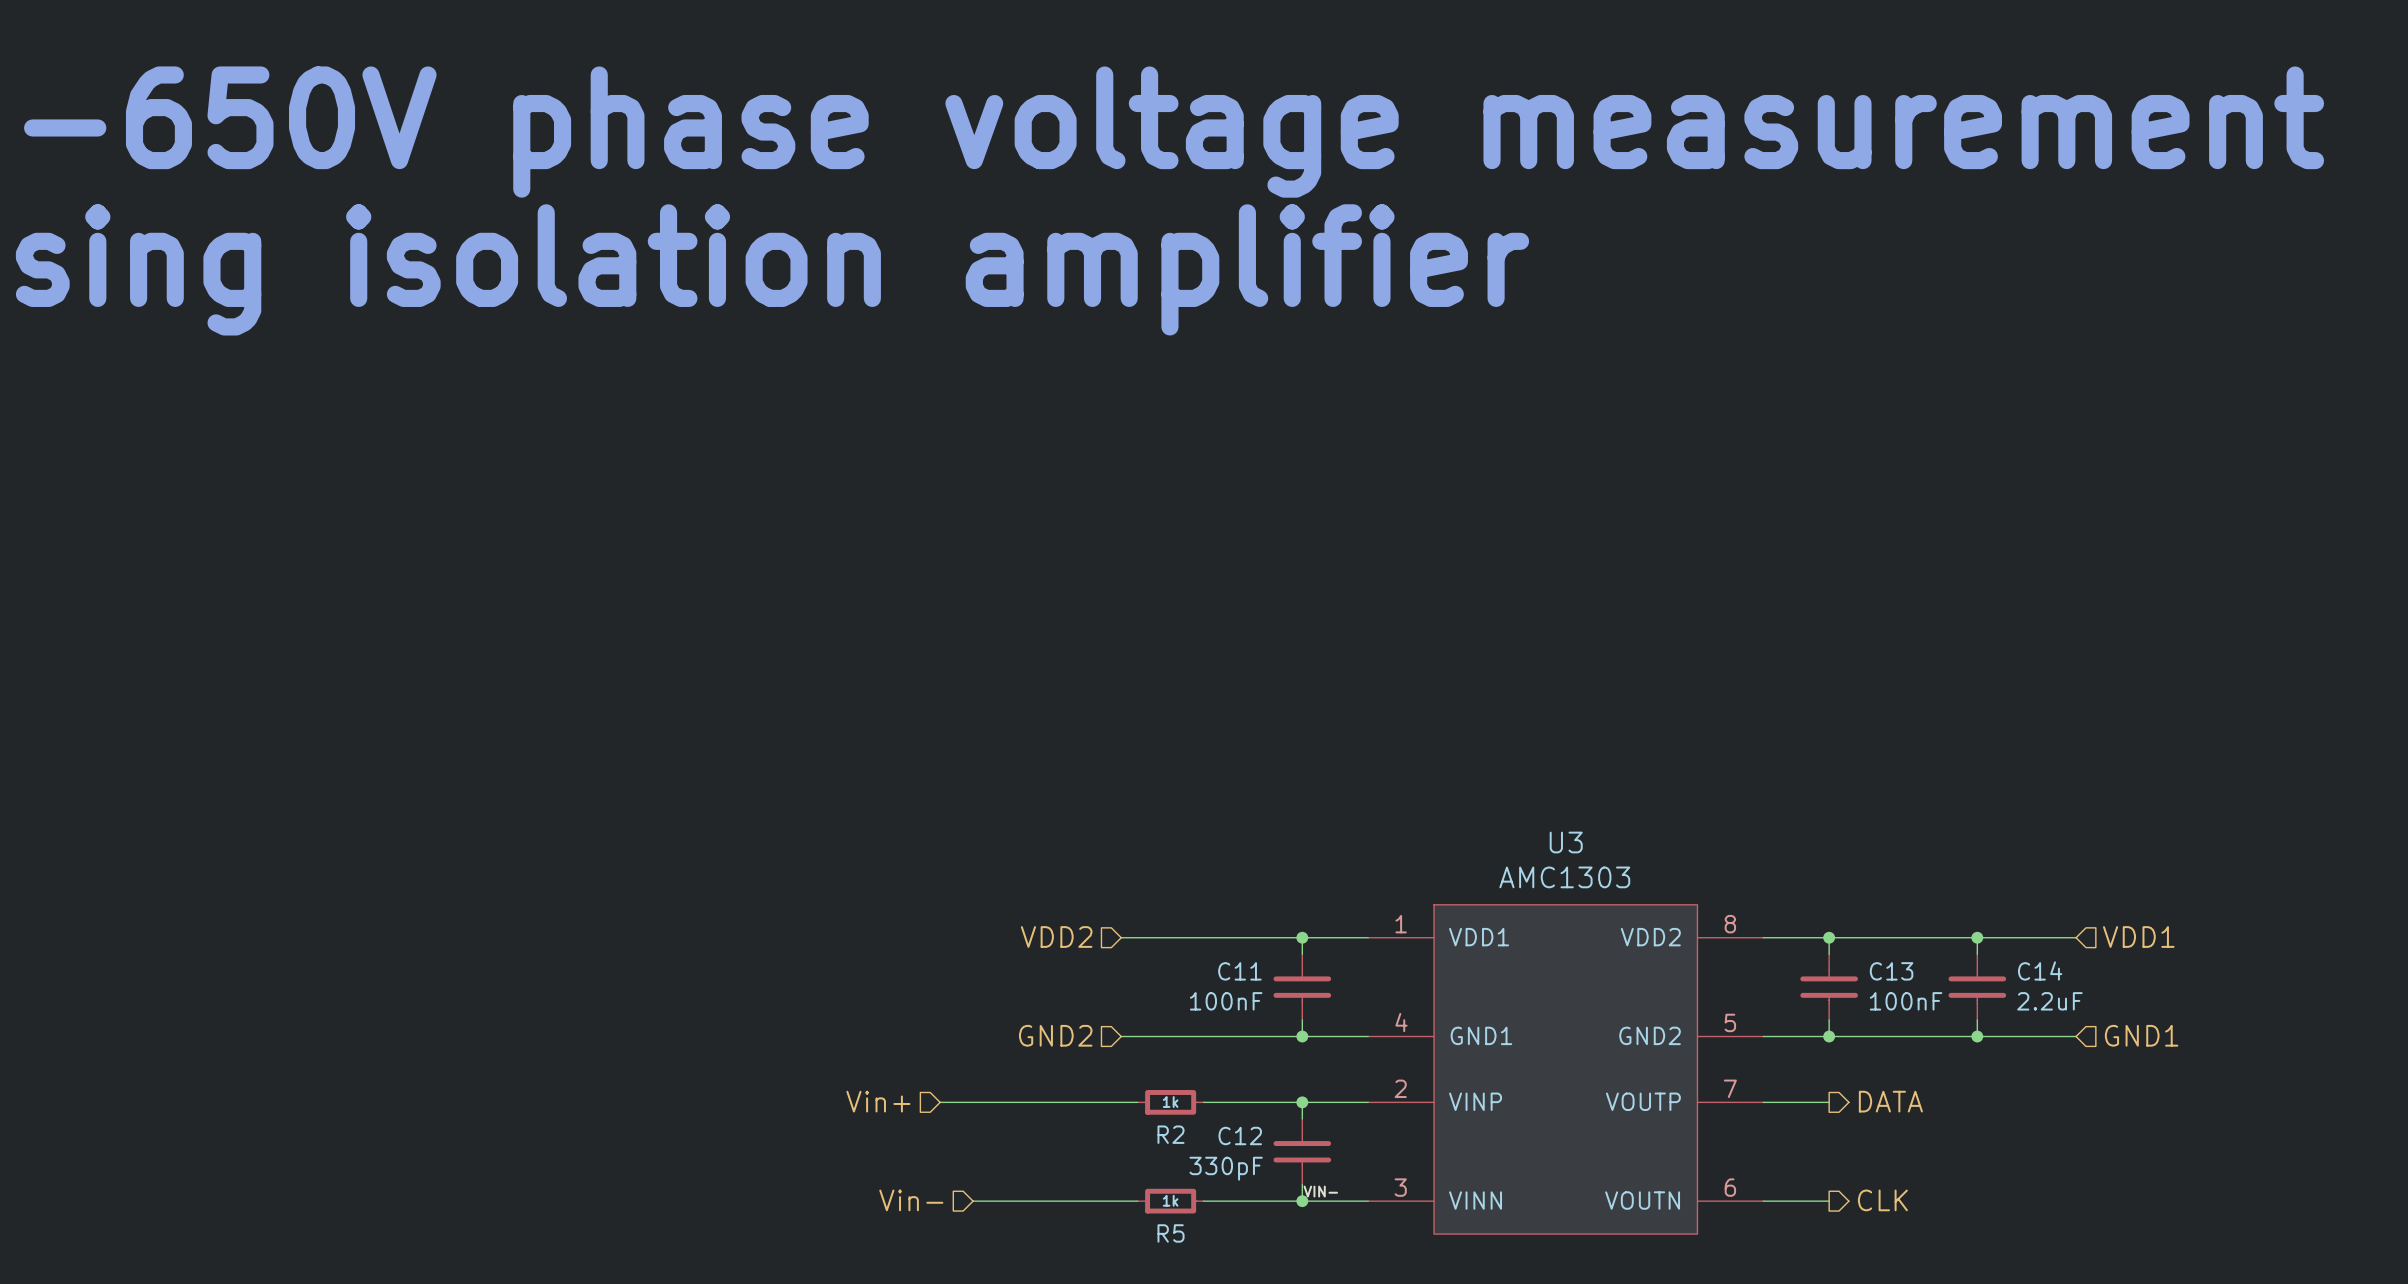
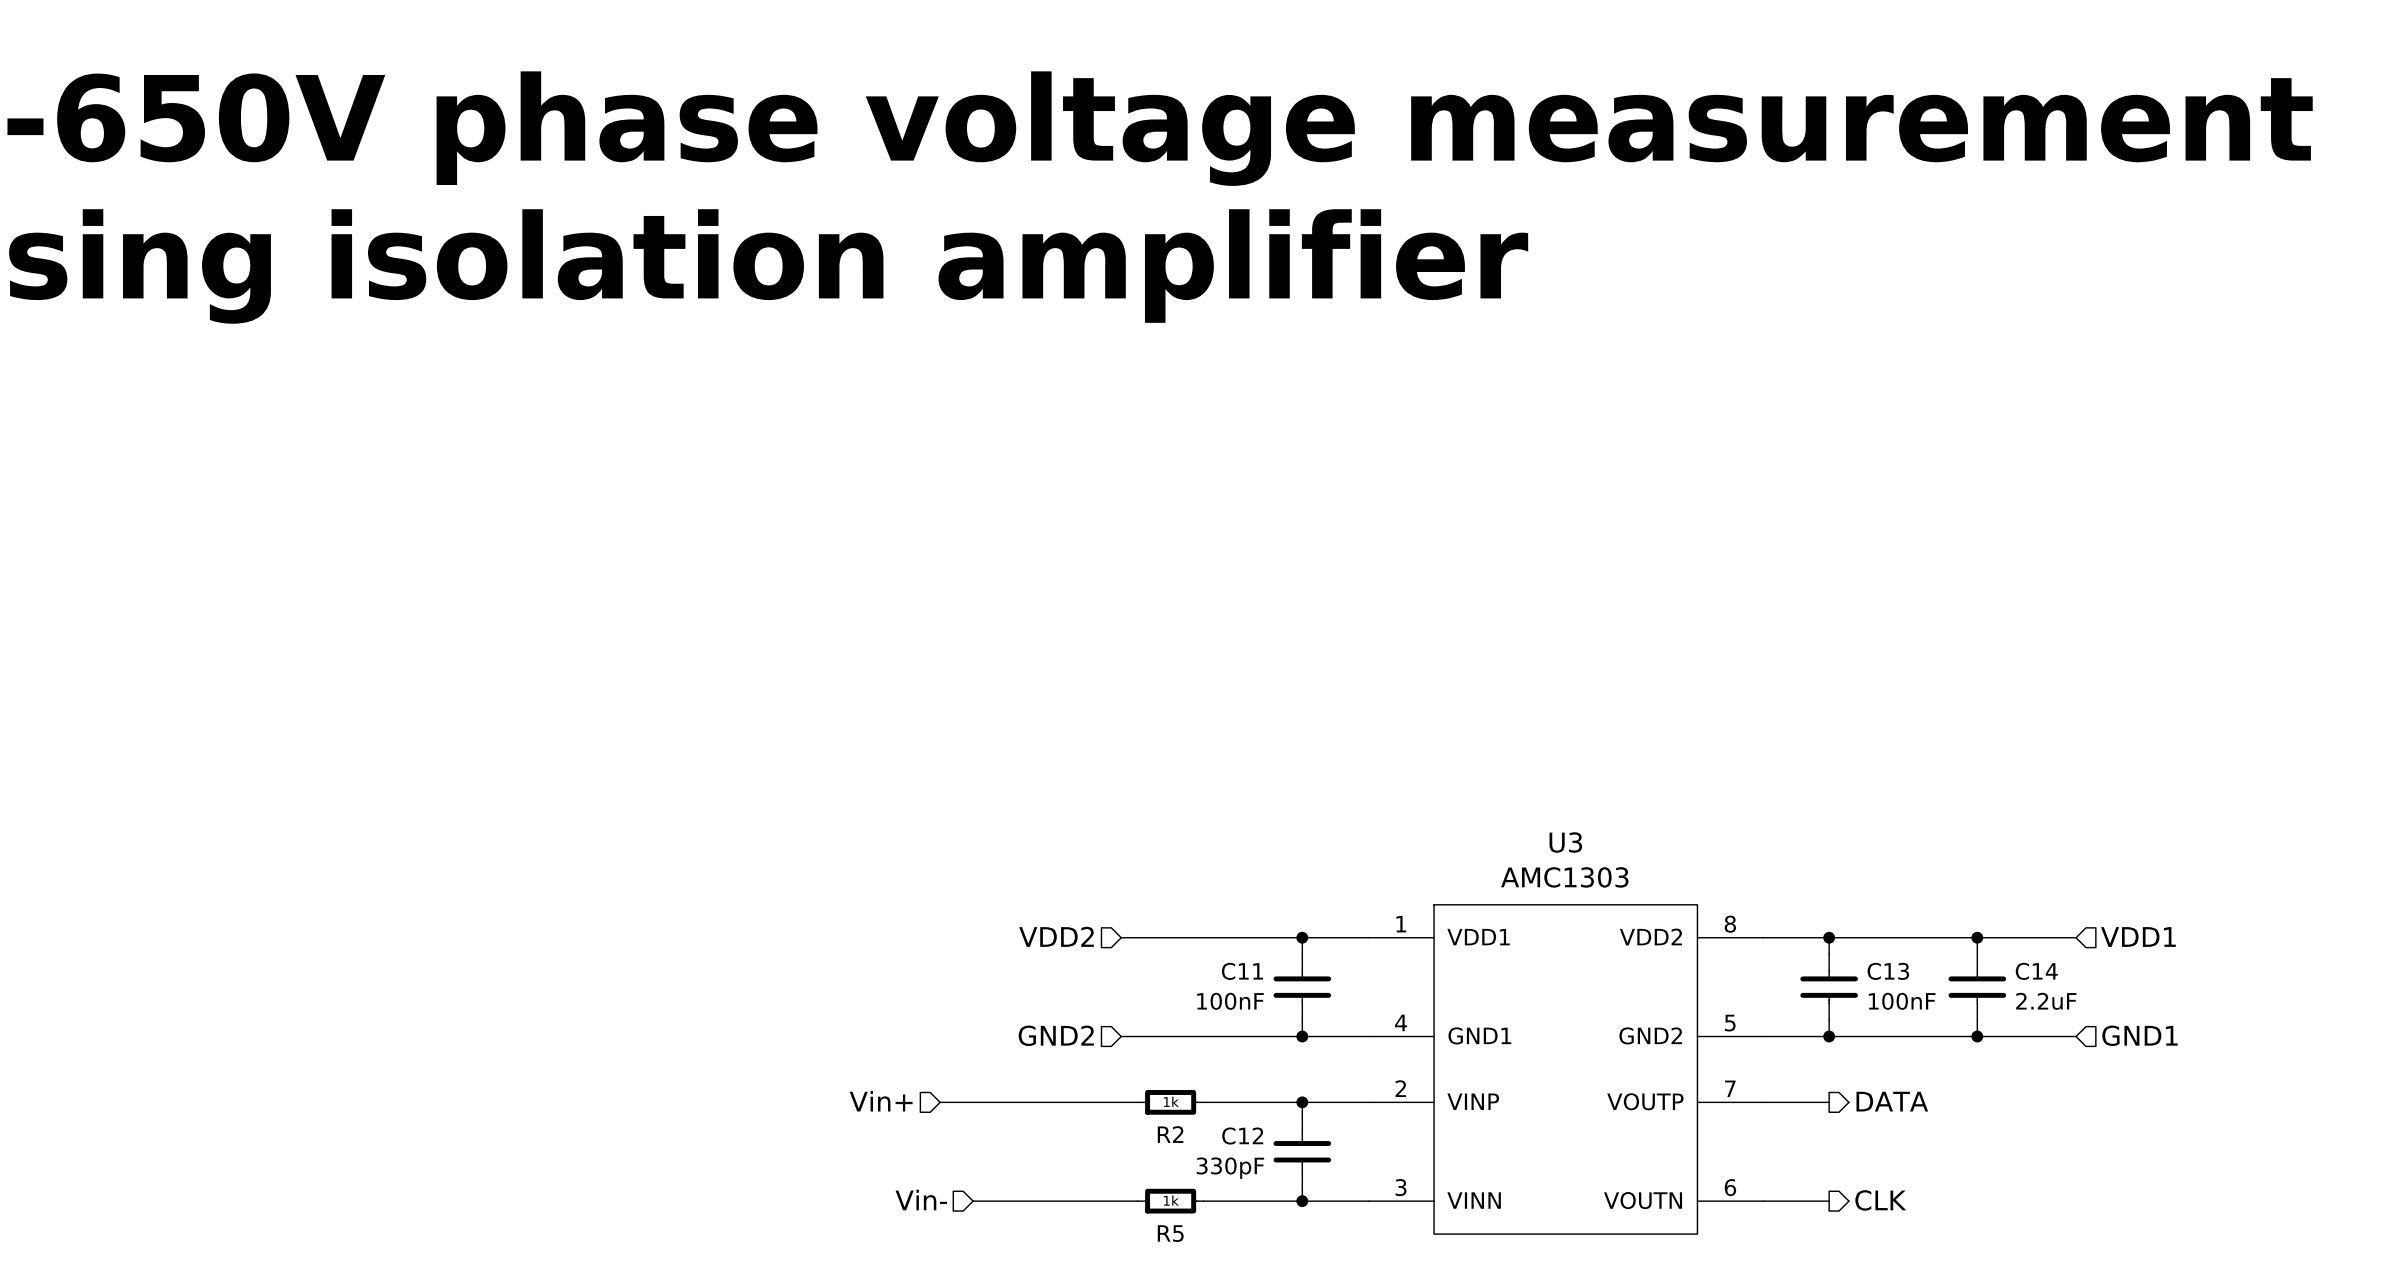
label: VIN- (1320, 1191) -> none

